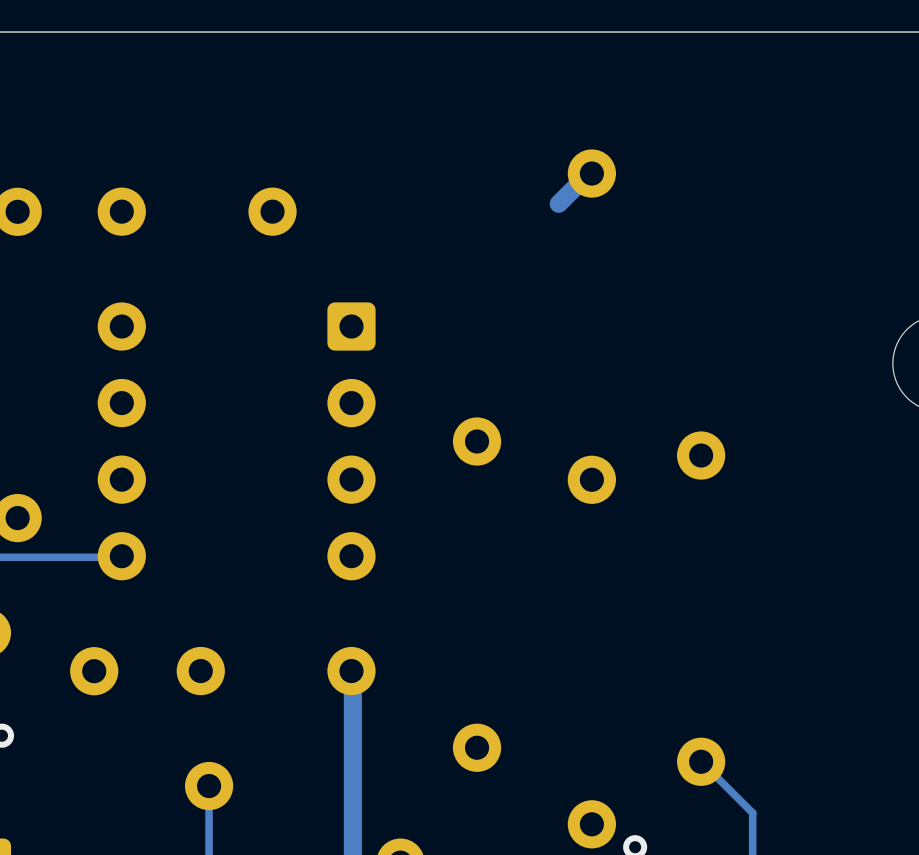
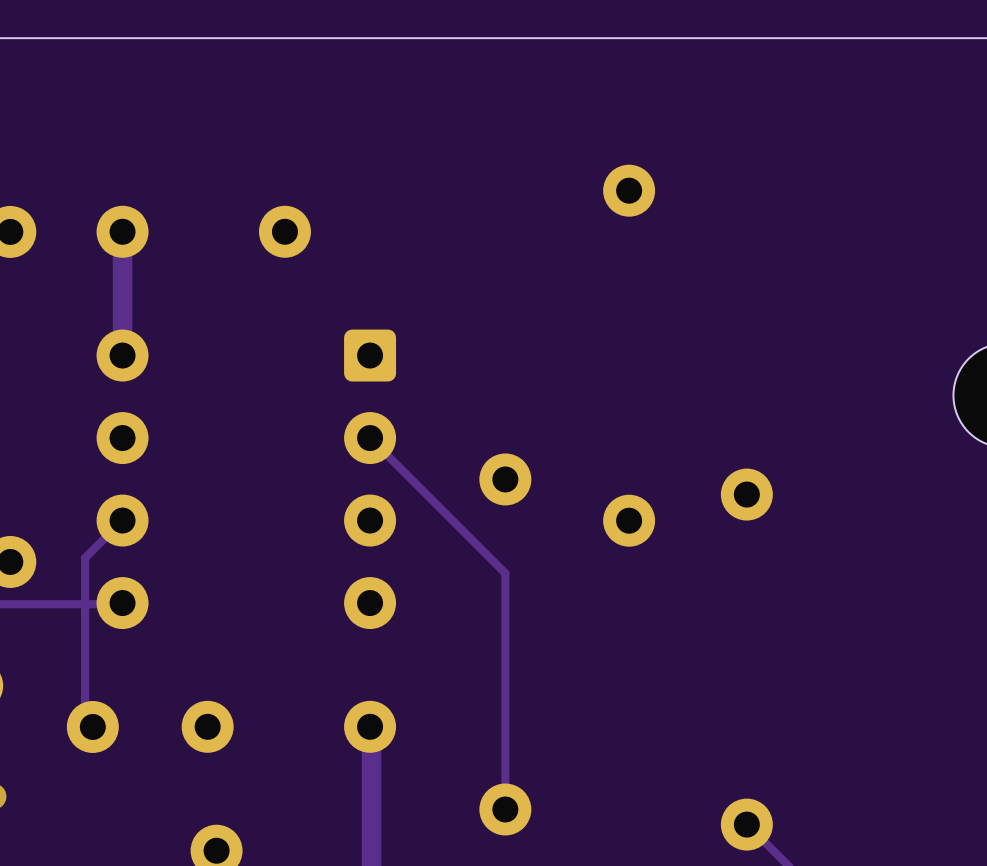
track: (591, 173) (588, 173) (558, 203) -> none
track: none -> (122, 231) (122, 355)
track: none -> (370, 438) (505, 573) (505, 809)
track: none -> (122, 520) (85, 558) (85, 726)

